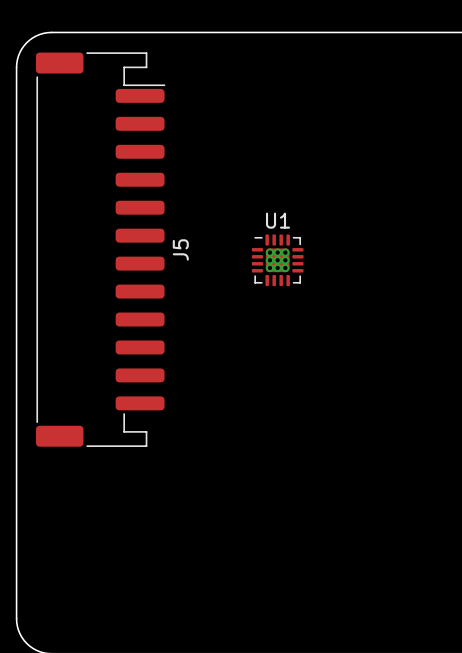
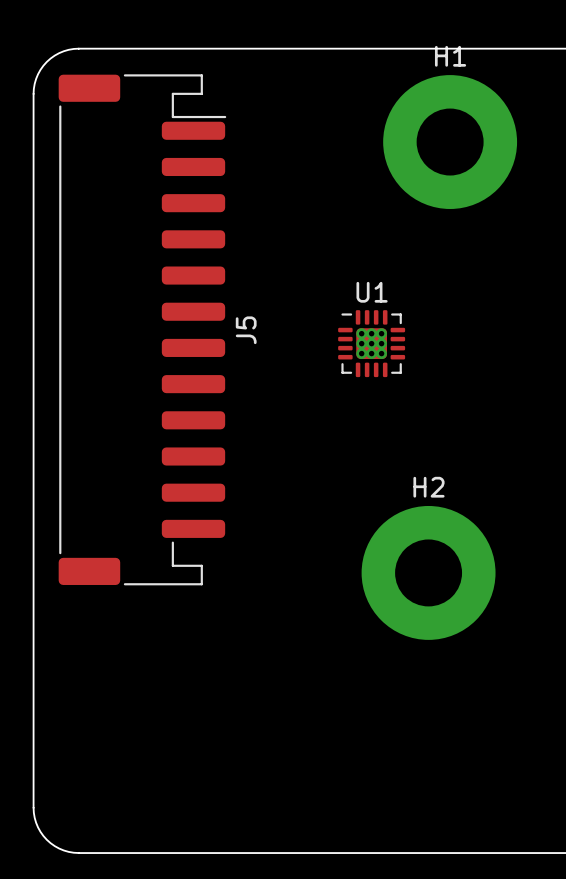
H1: none -> (450, 142)
H2: none -> (428, 572)

